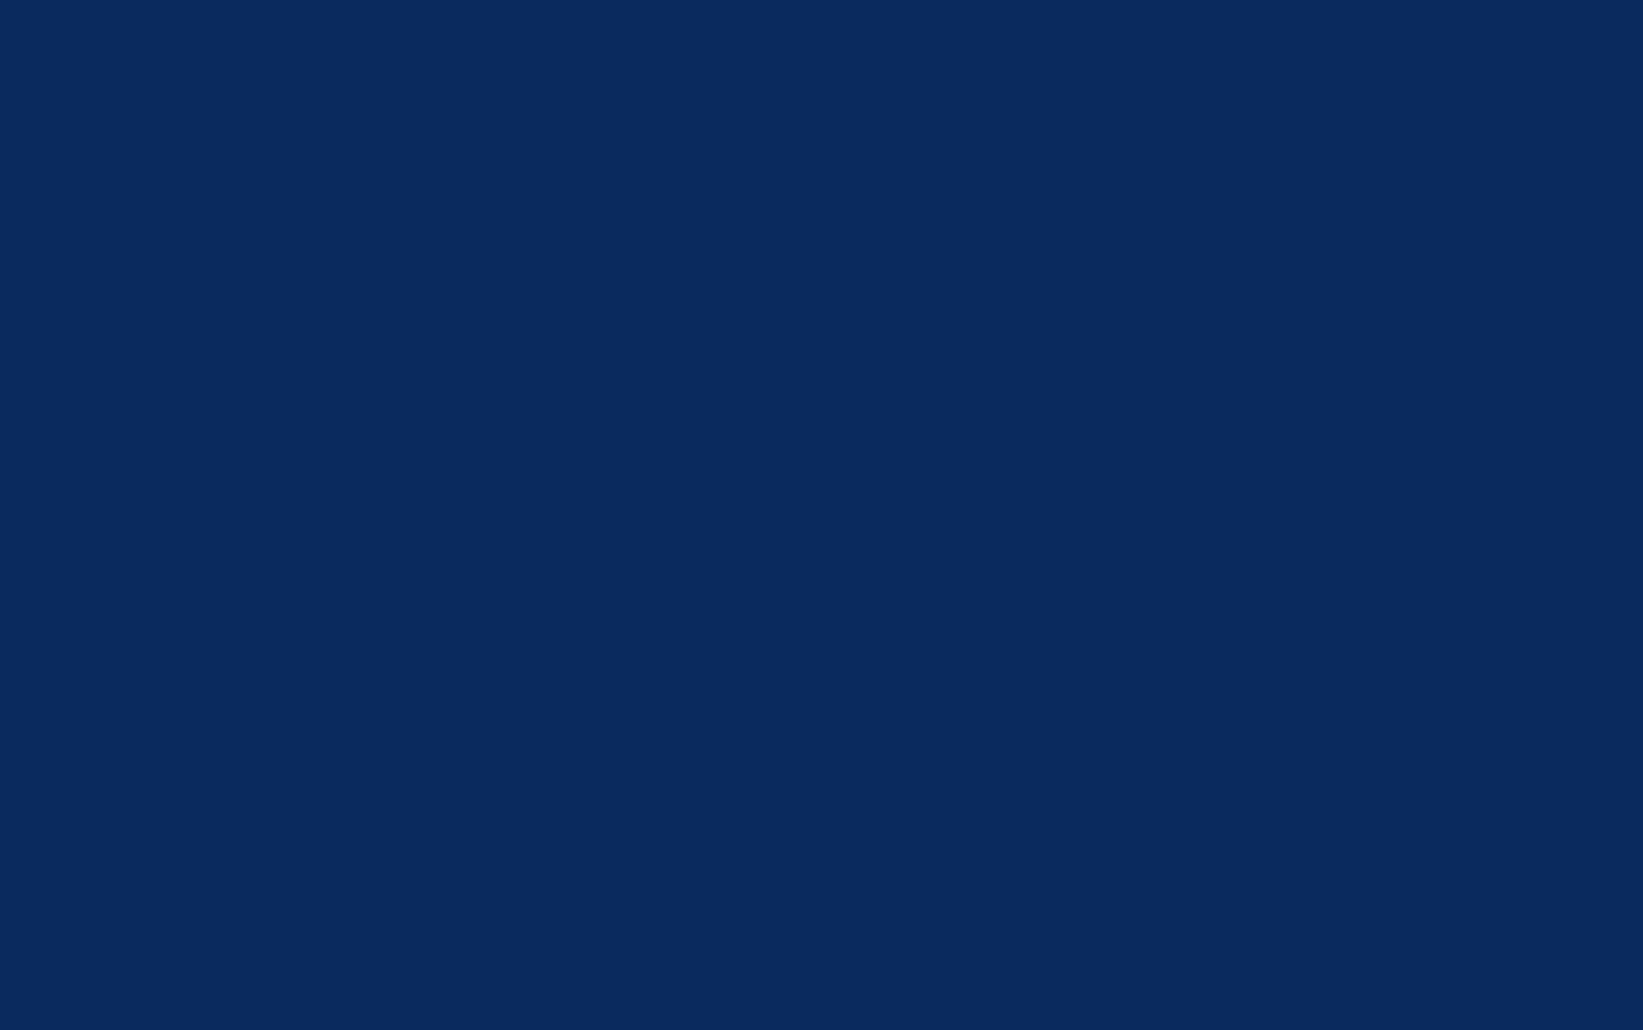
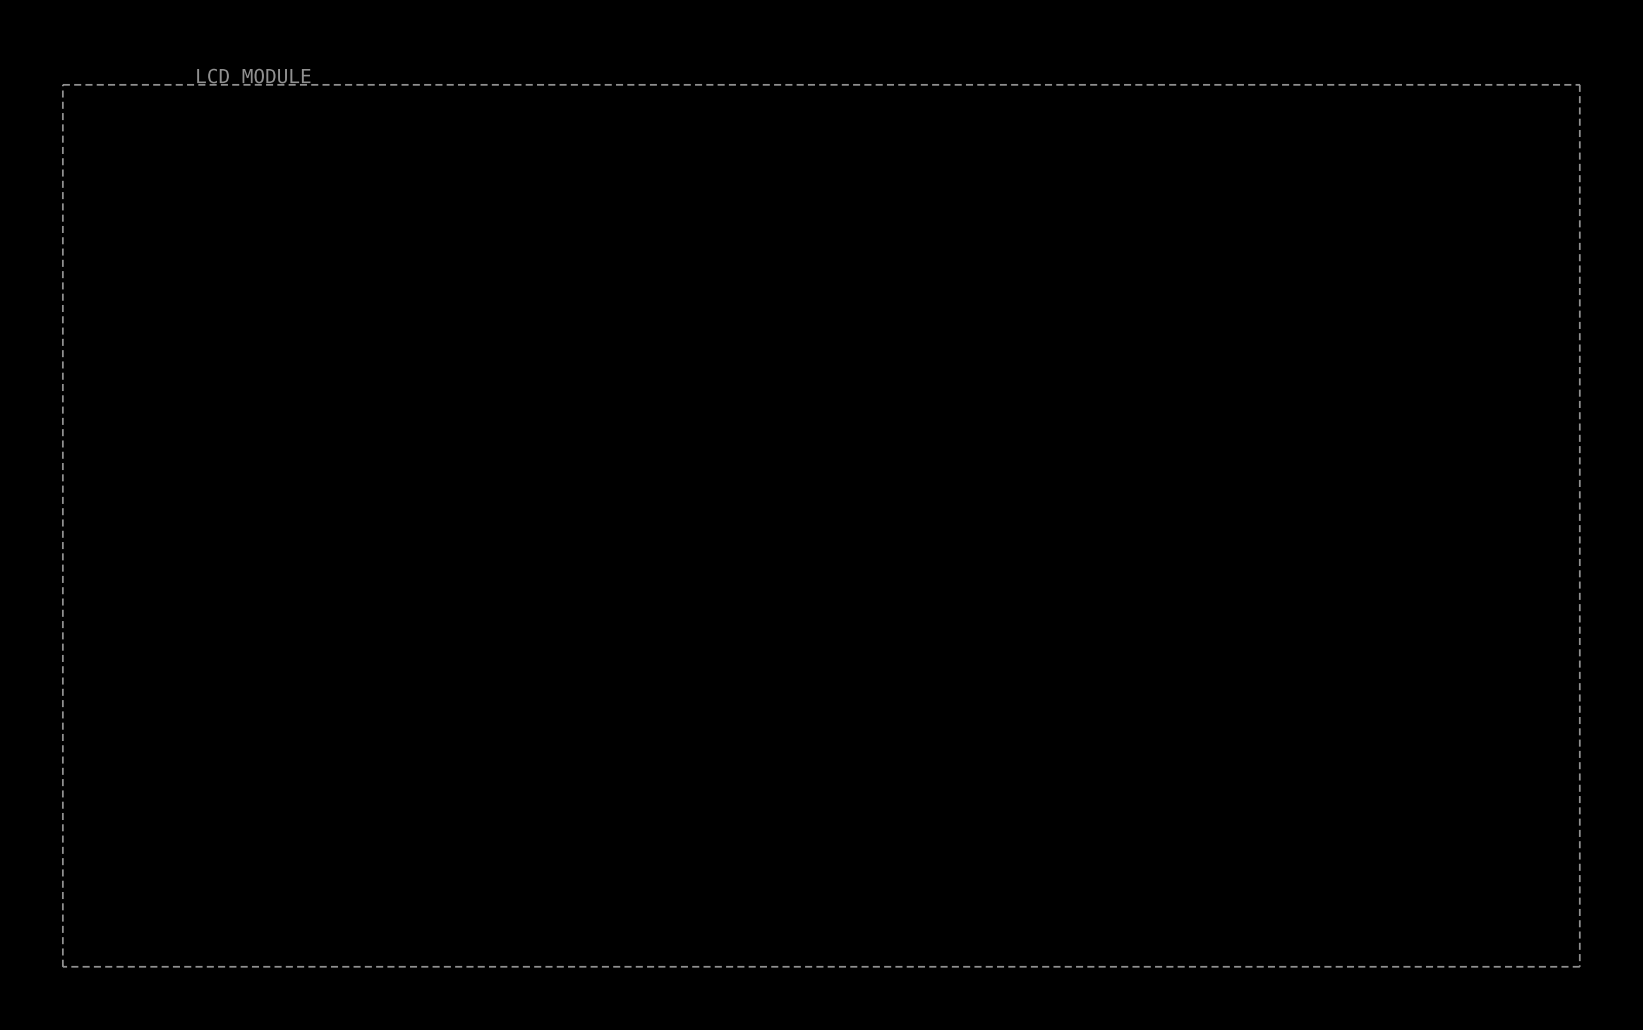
text: none -> LCD MODULE (253, 76)
line: none -> (62, 84) (1579, 84) (1579, 966) (62, 966) (62, 84)

